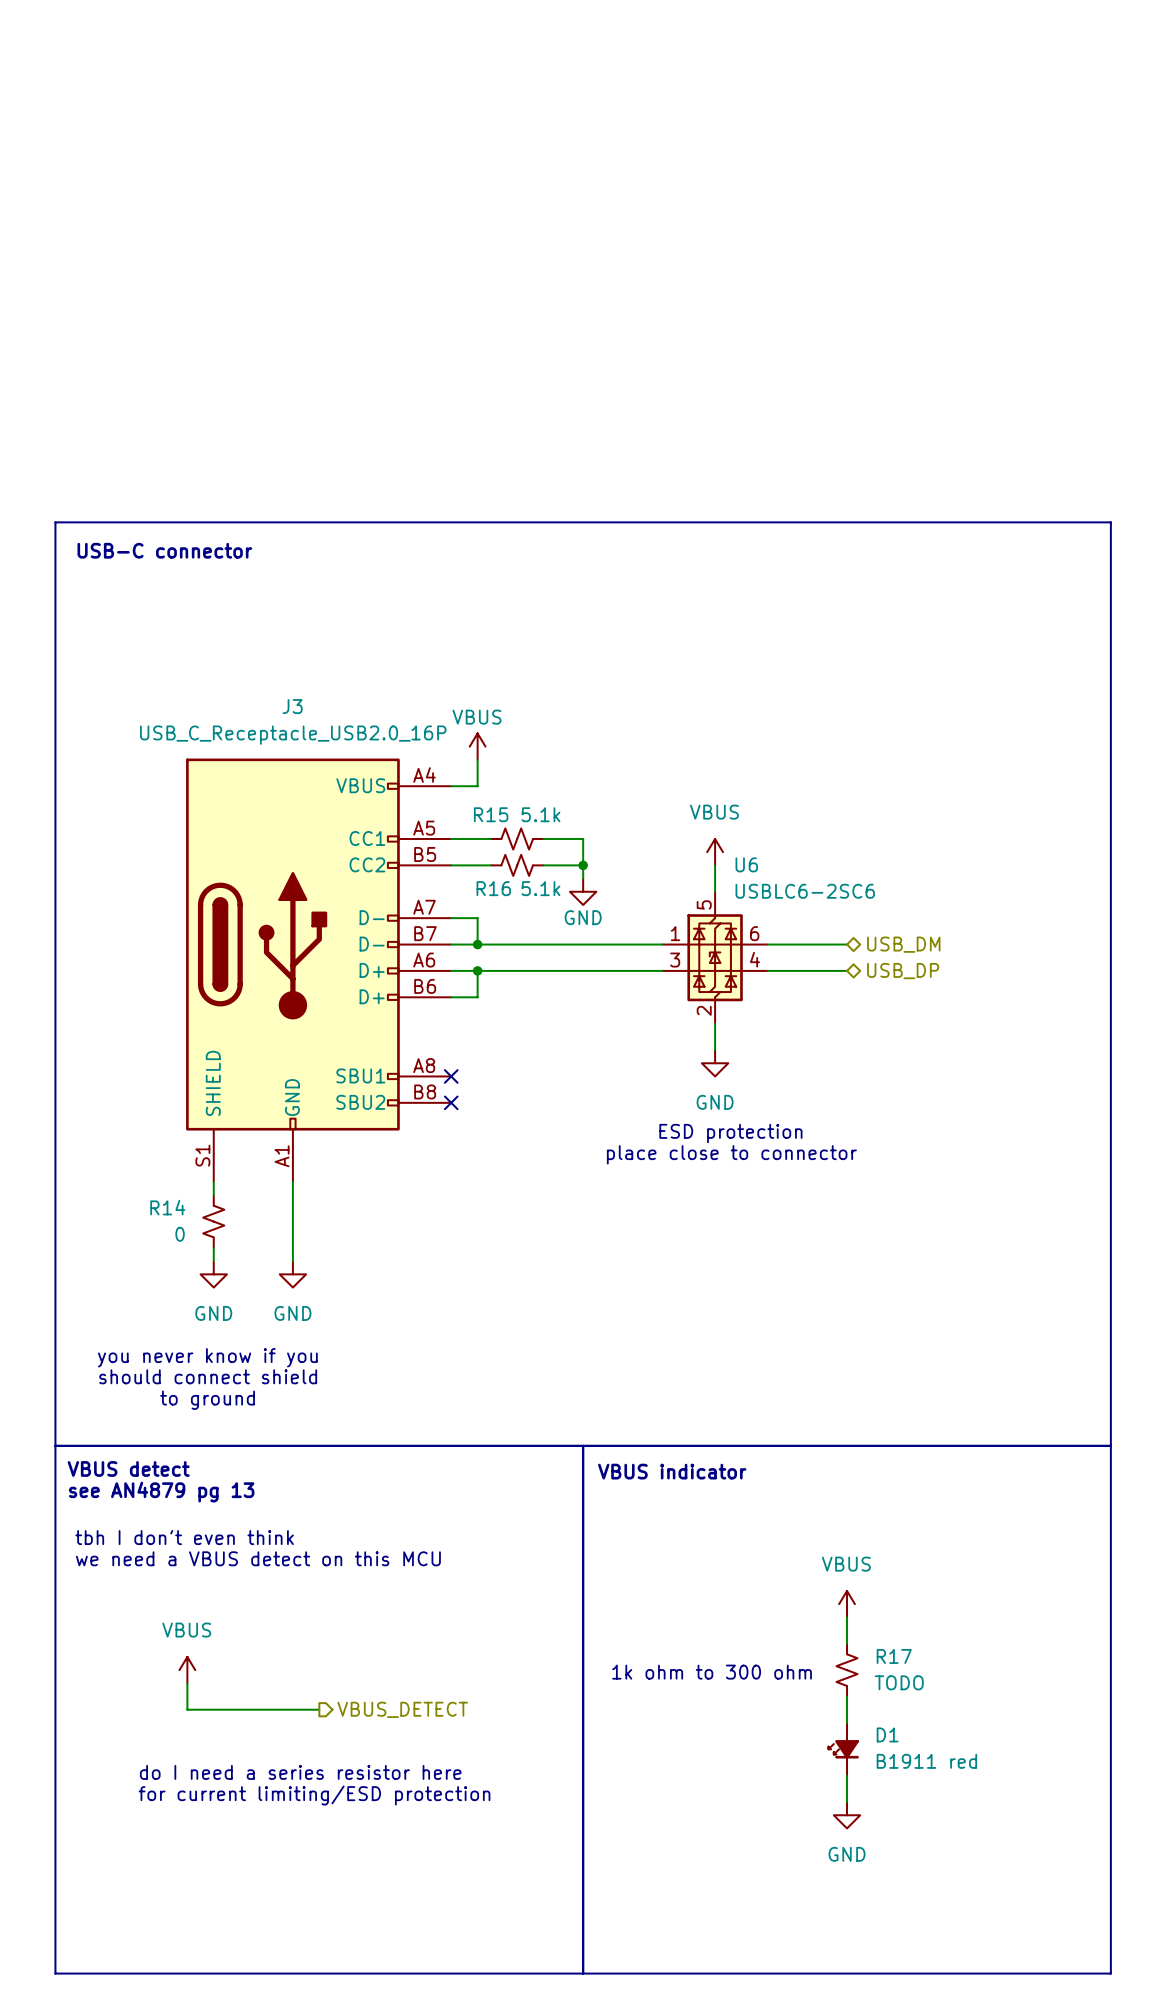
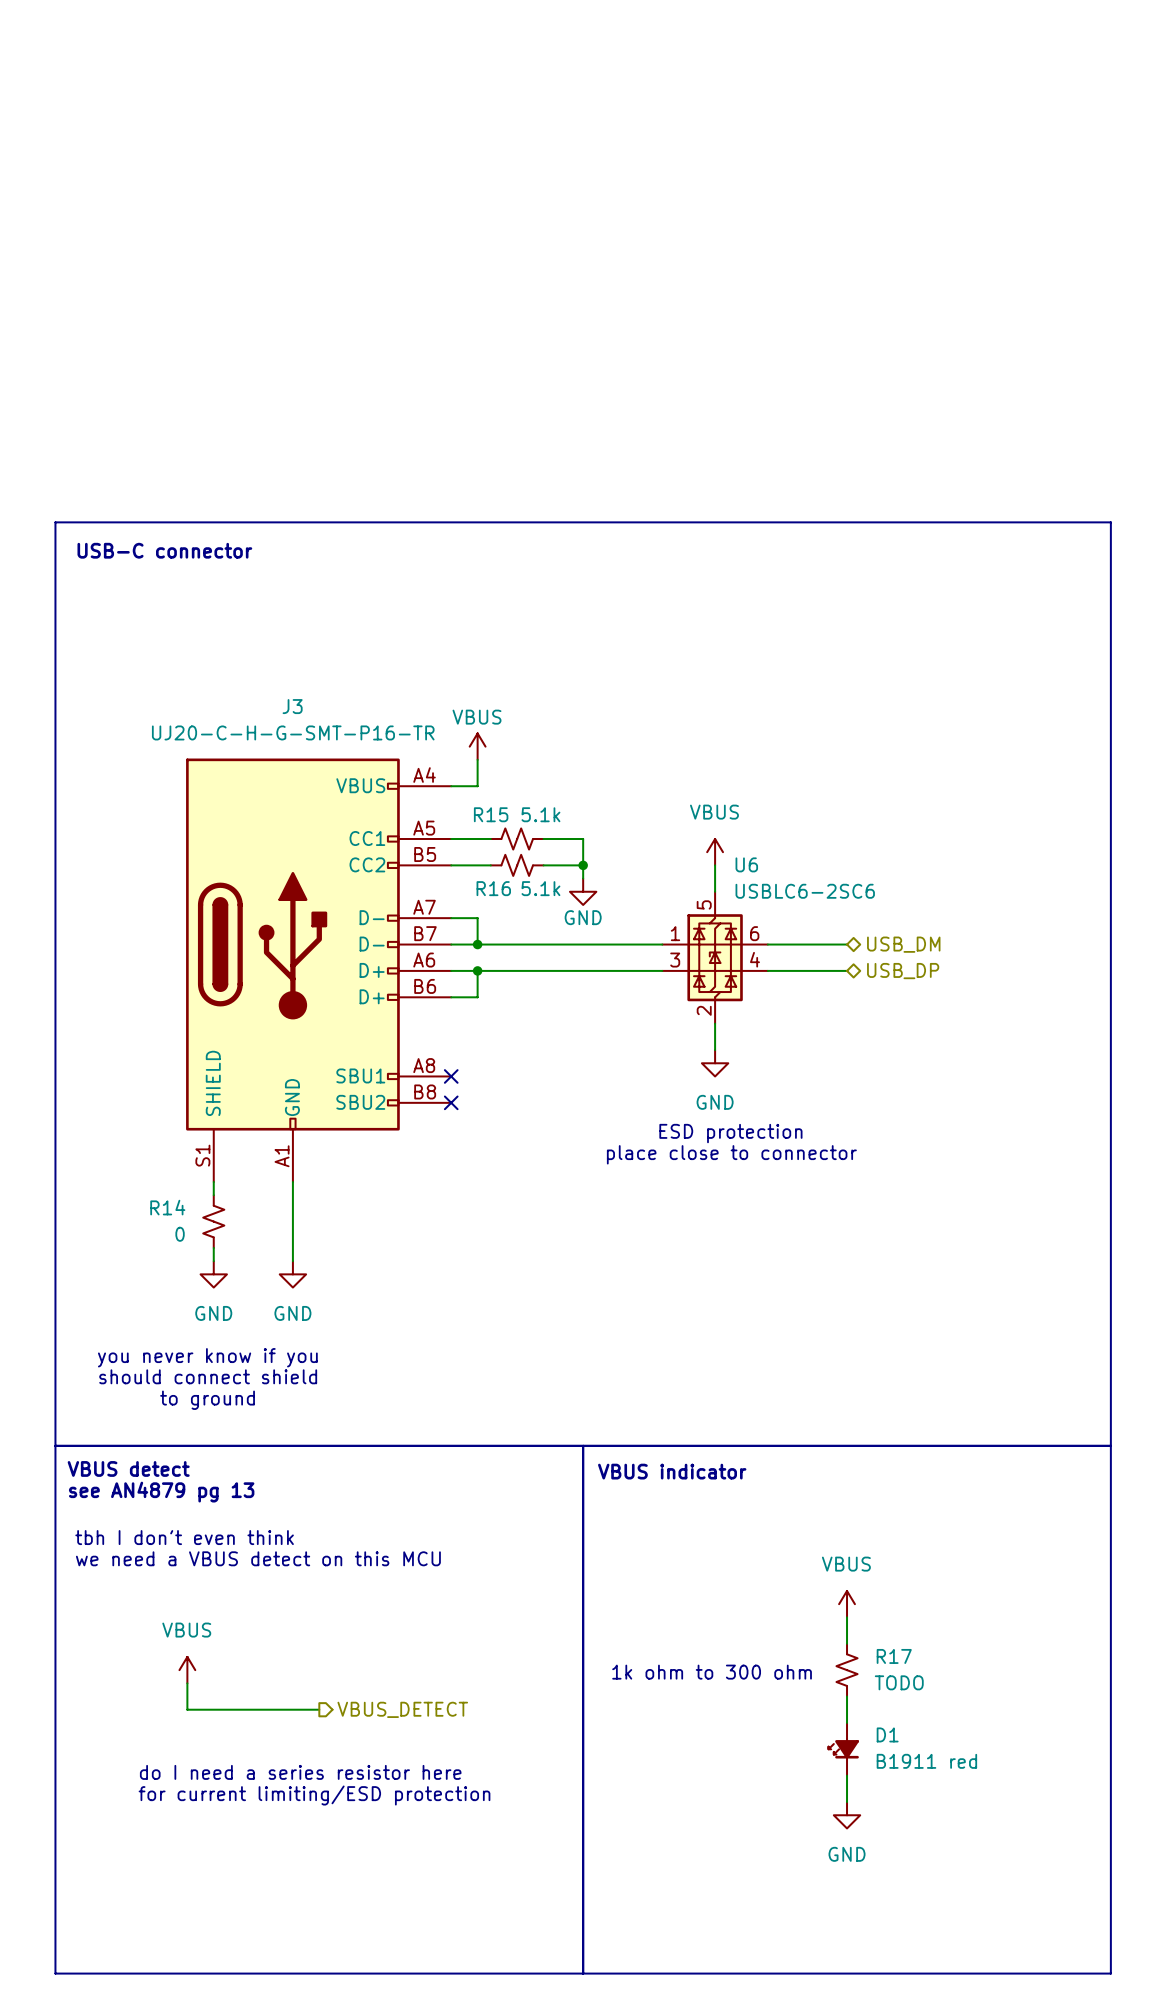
J3 value: USB_C_Receptacle_USB2.0_16P (293, 735) -> UJ20-C-H-G-SMT-P16-TR (293, 732)

